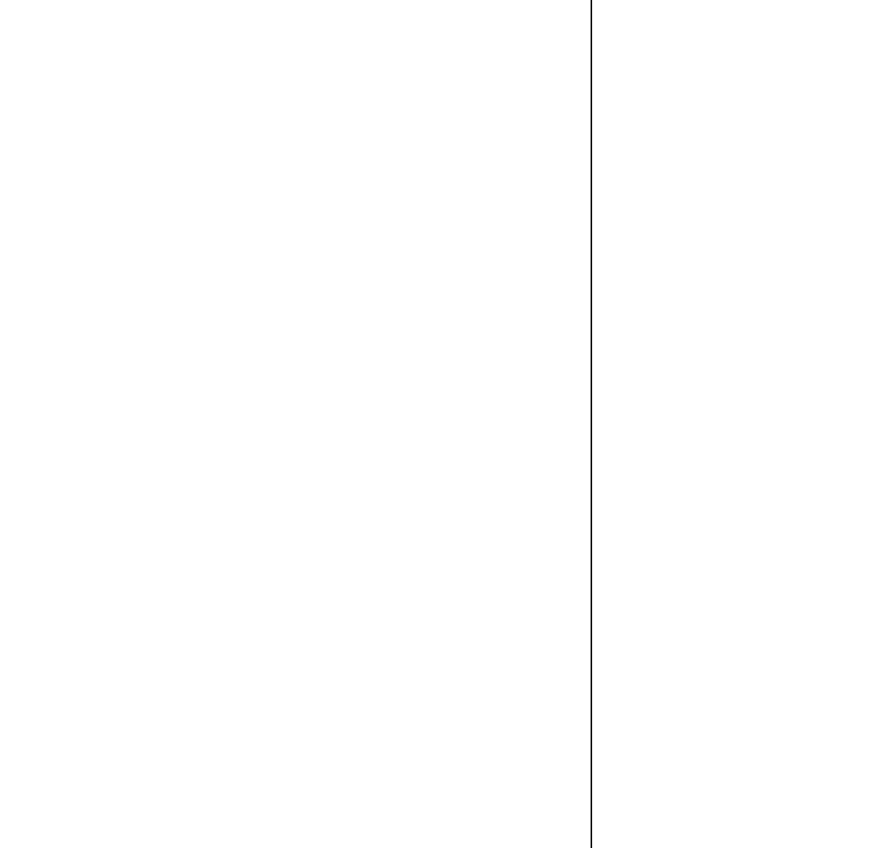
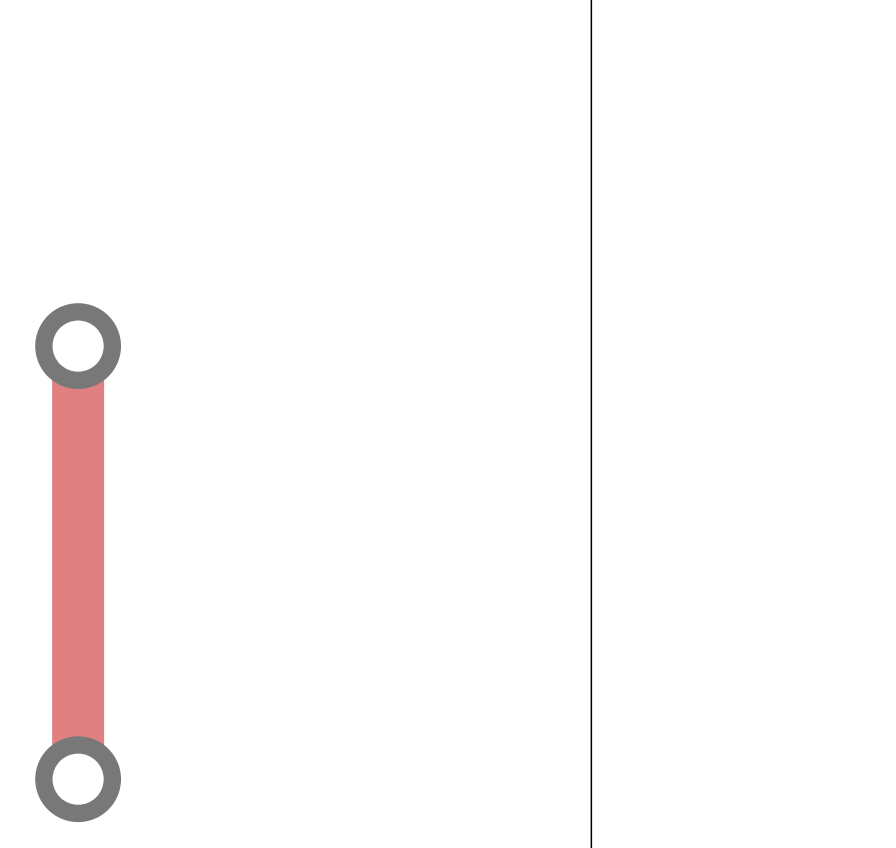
track: none -> (78, 346) (78, 779)
via: none -> (78, 346)
via: none -> (78, 779)

